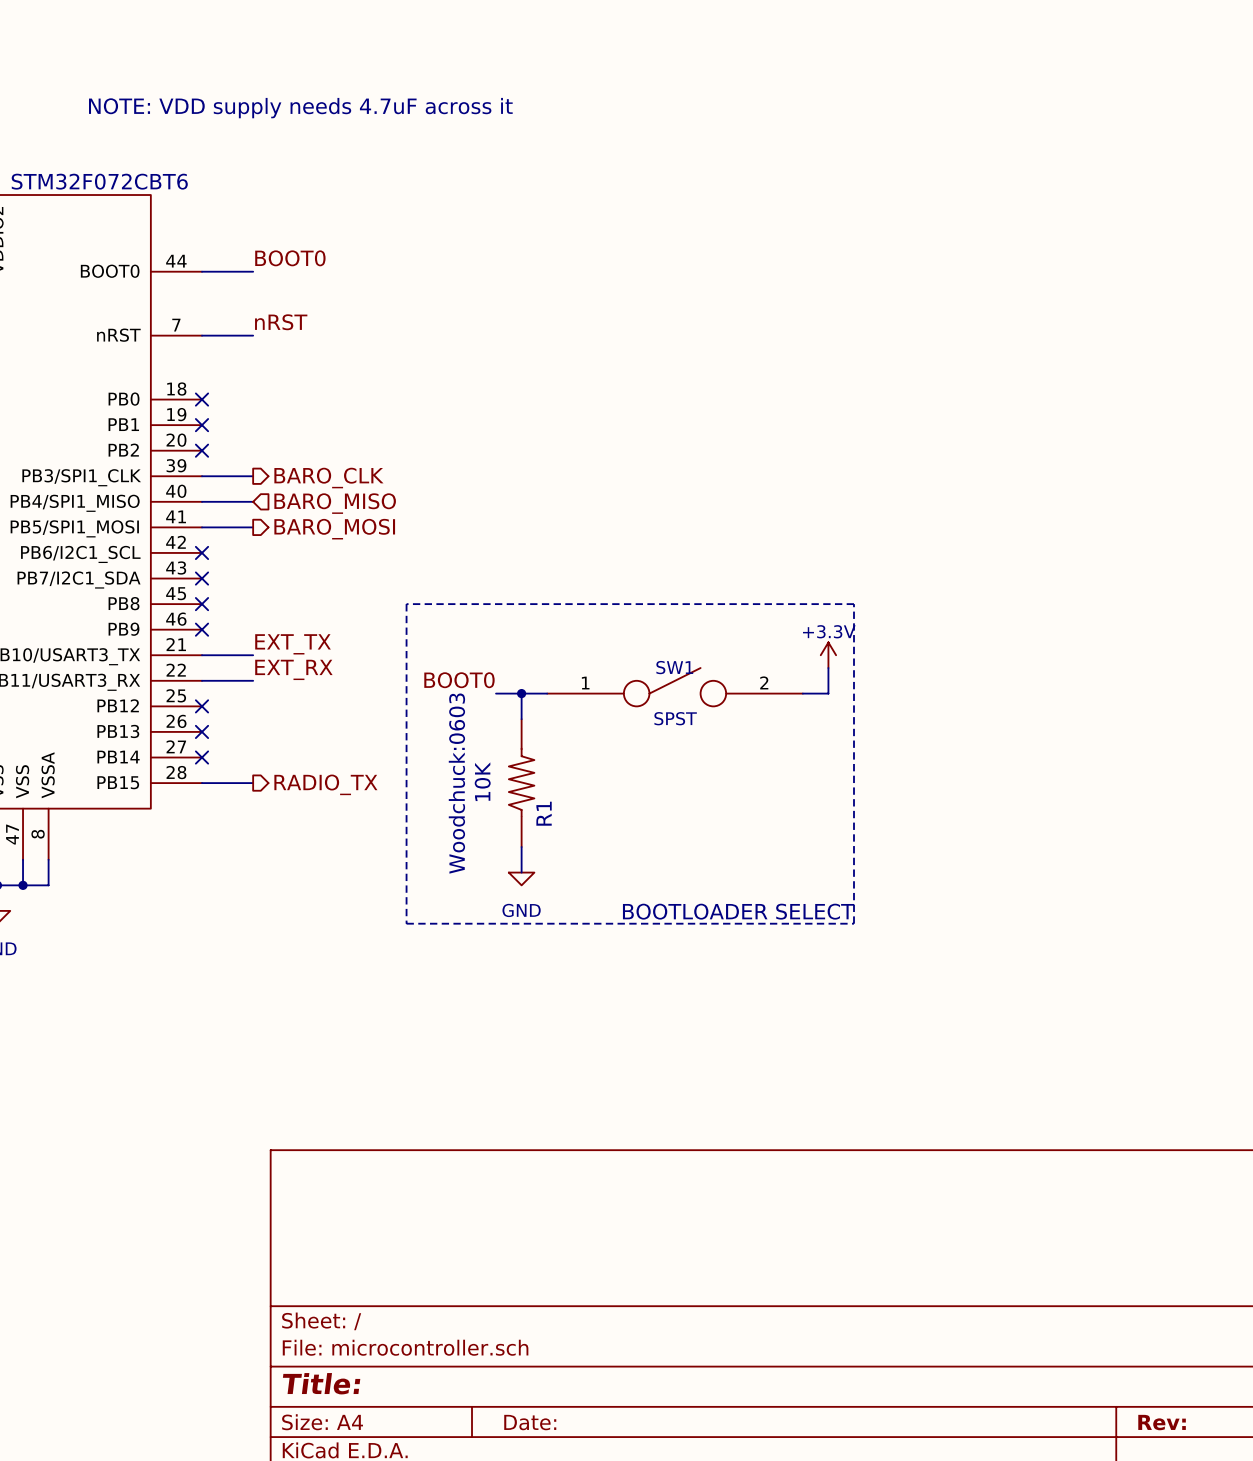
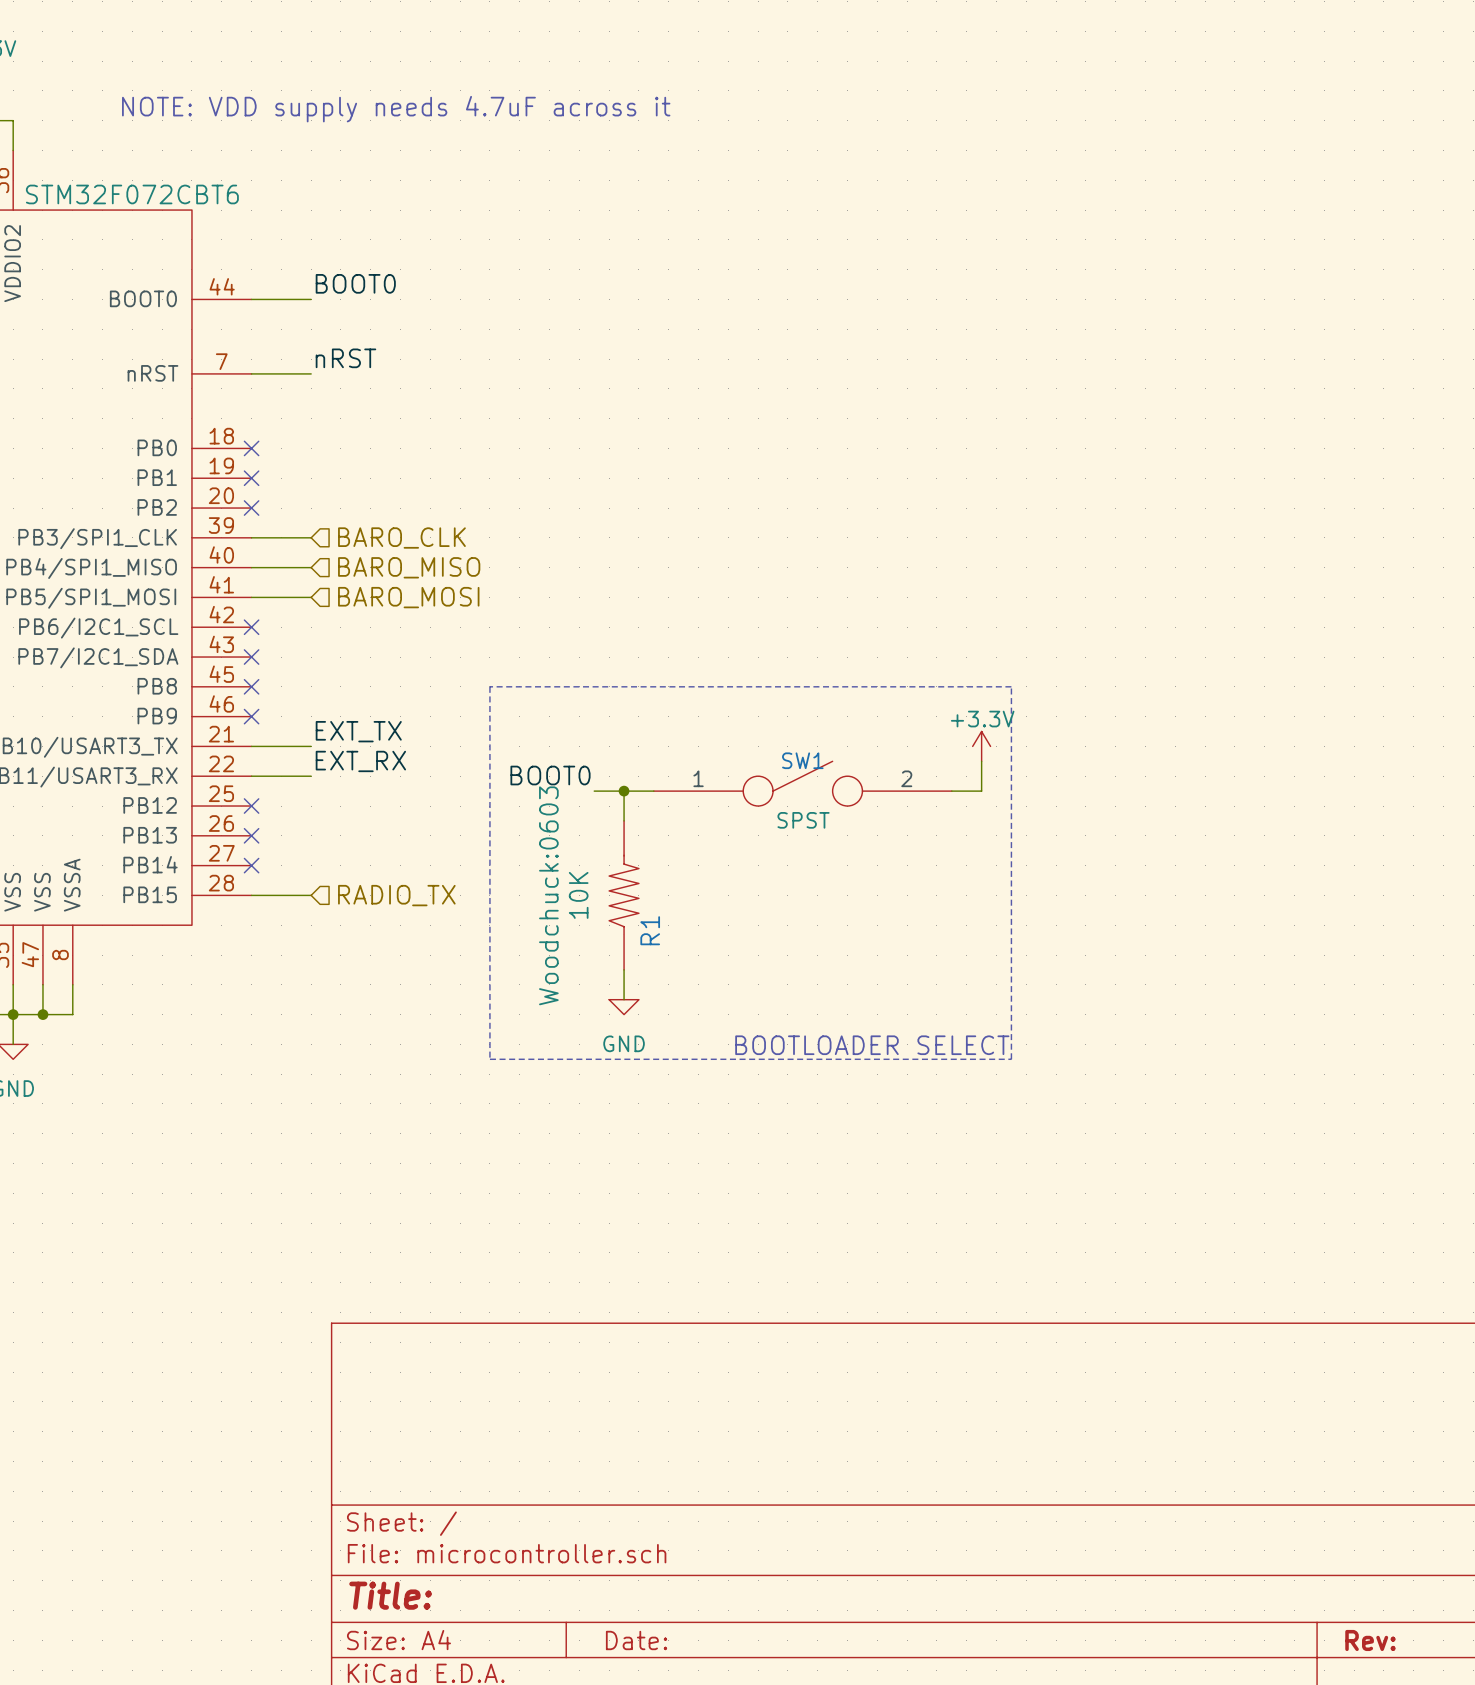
hierarchical label shape: output (328, 478) -> input (401, 538)
hierarchical label shape: output (334, 529) -> input (408, 597)
hierarchical label shape: output (325, 784) -> input (396, 895)

